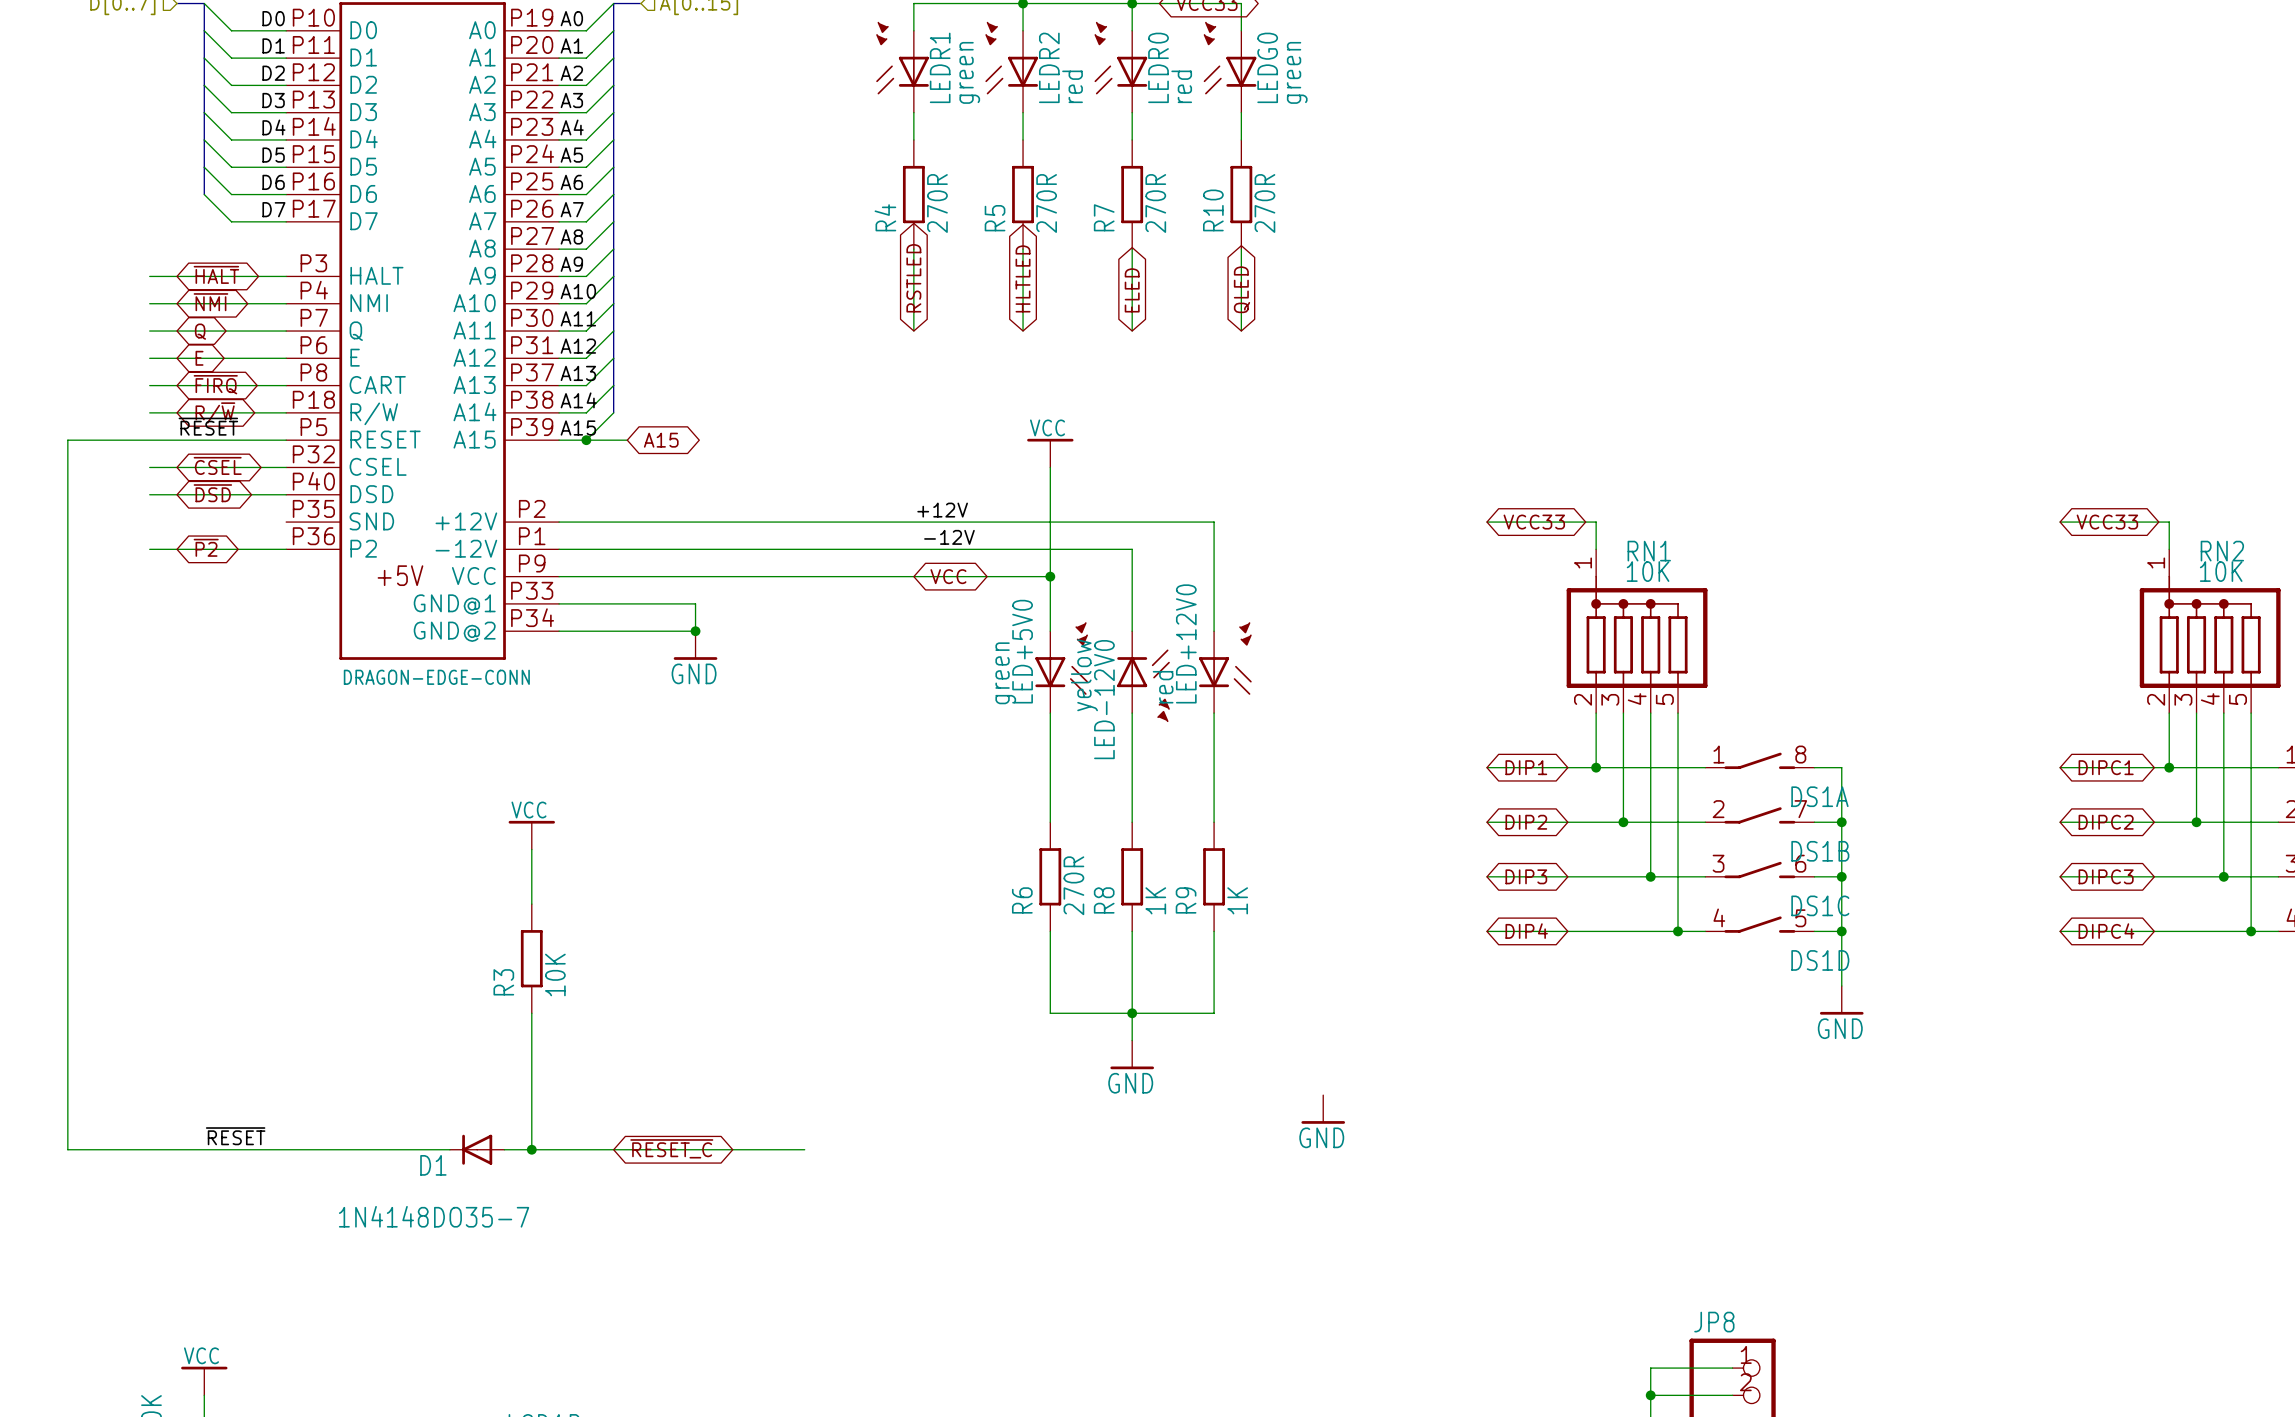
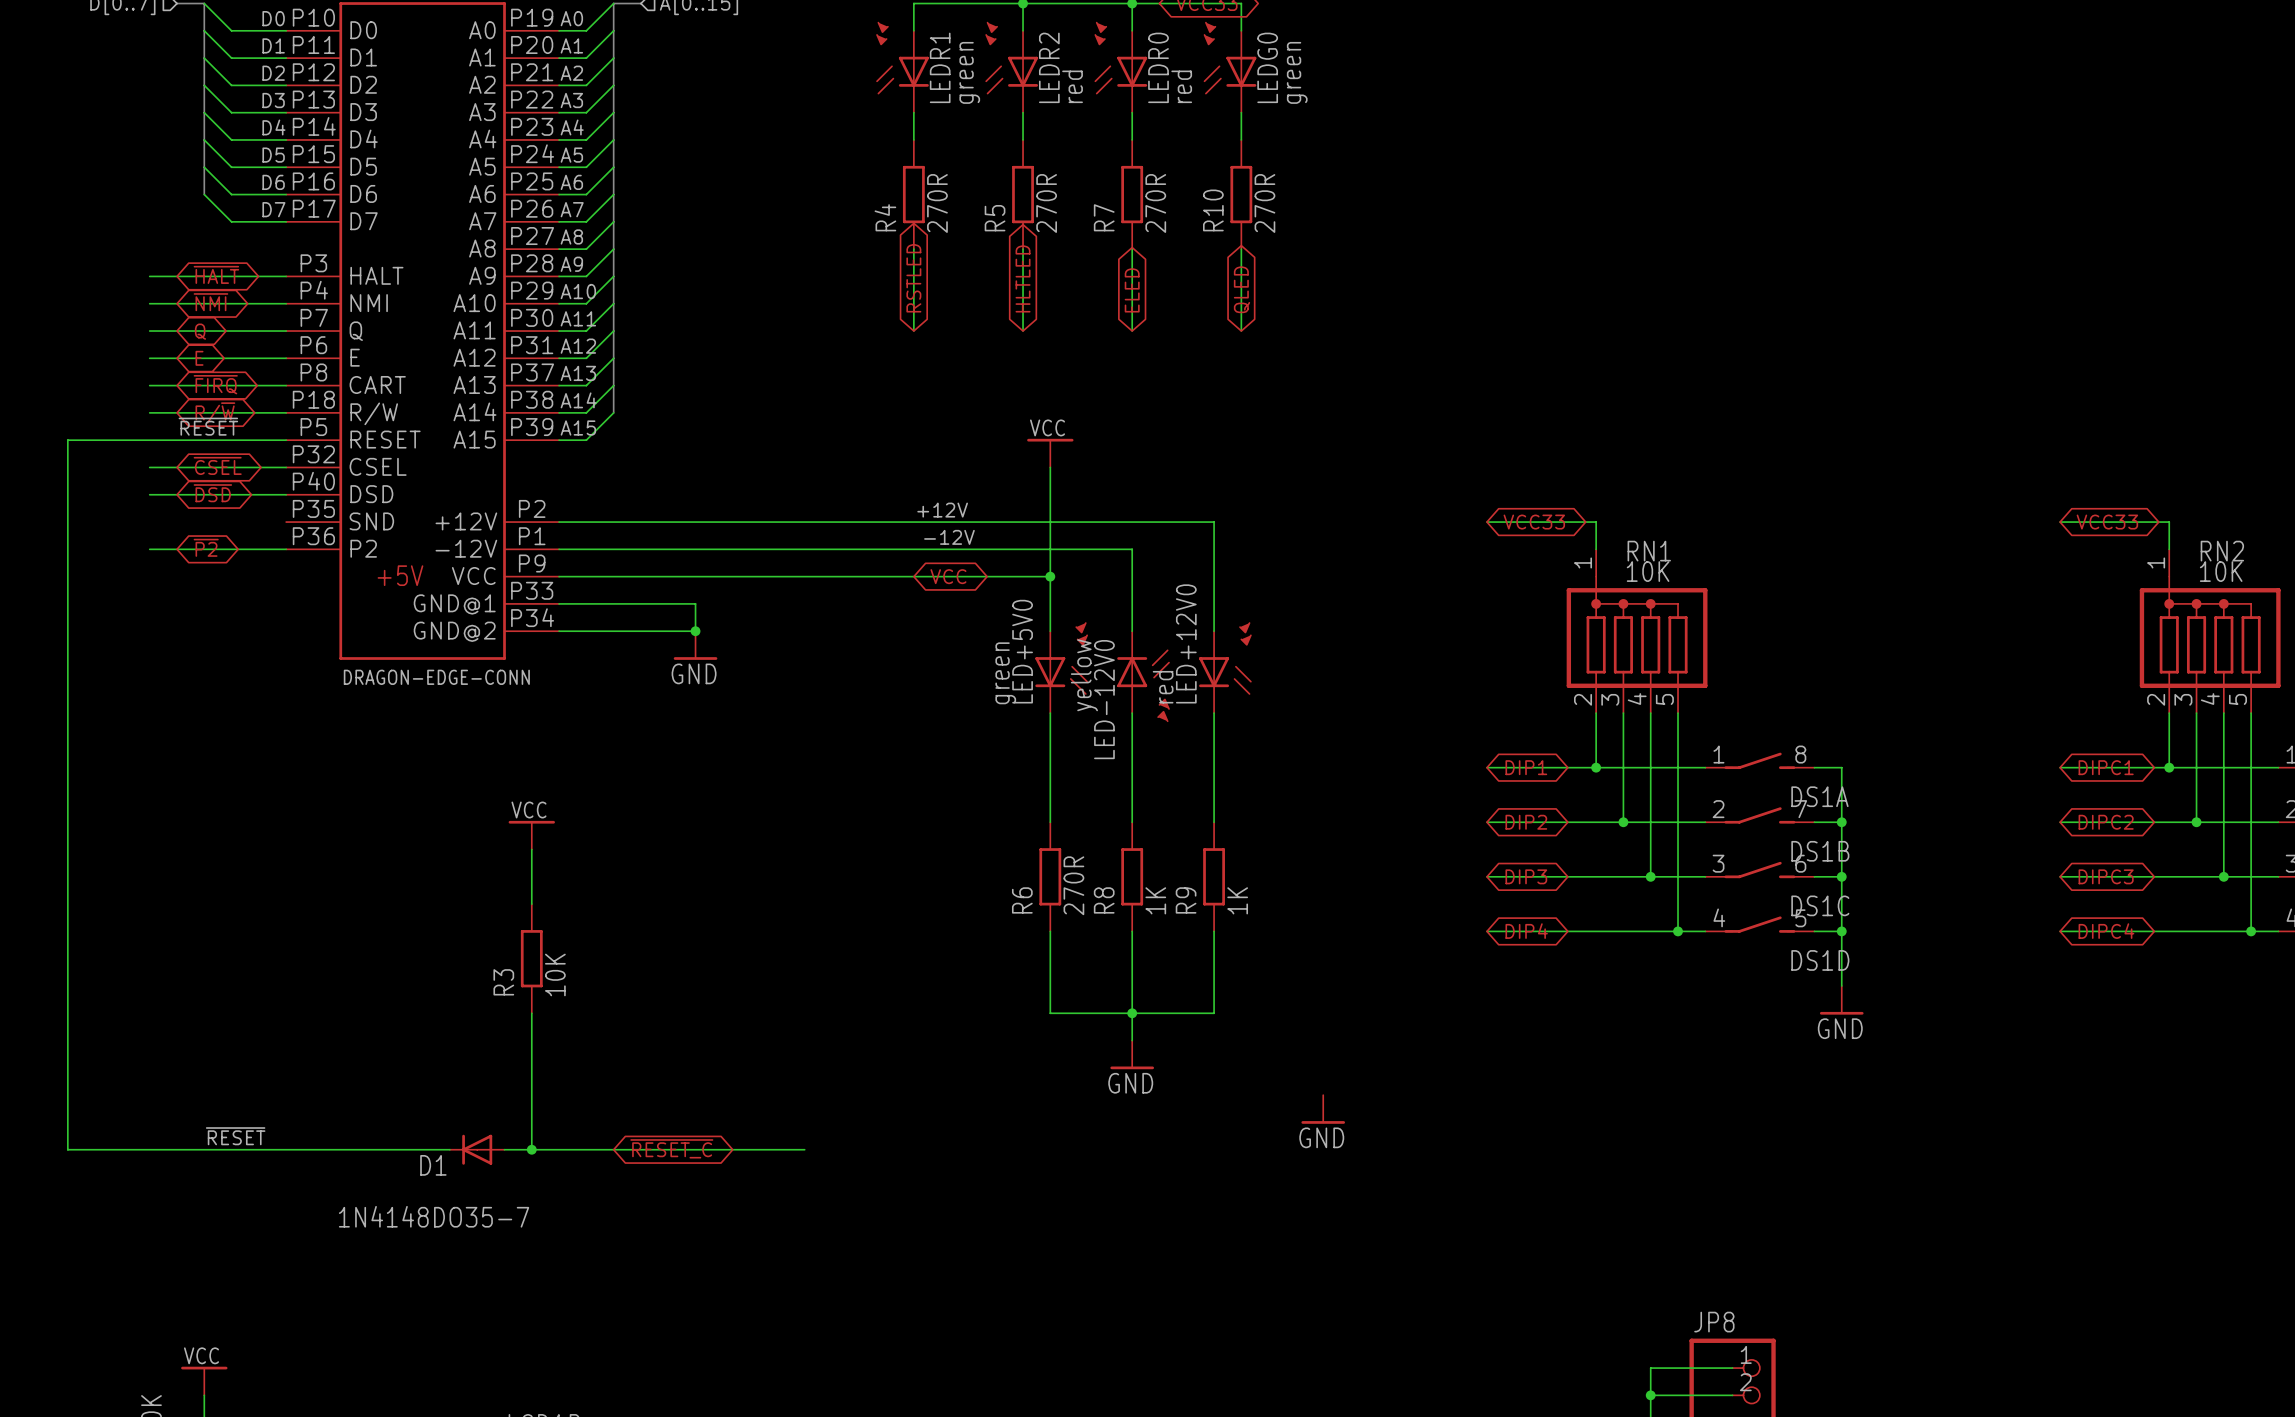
wire: (586, 440) (627, 440) -> none
junction: (586, 440) -> none
global label: A15 (661, 440) -> none

